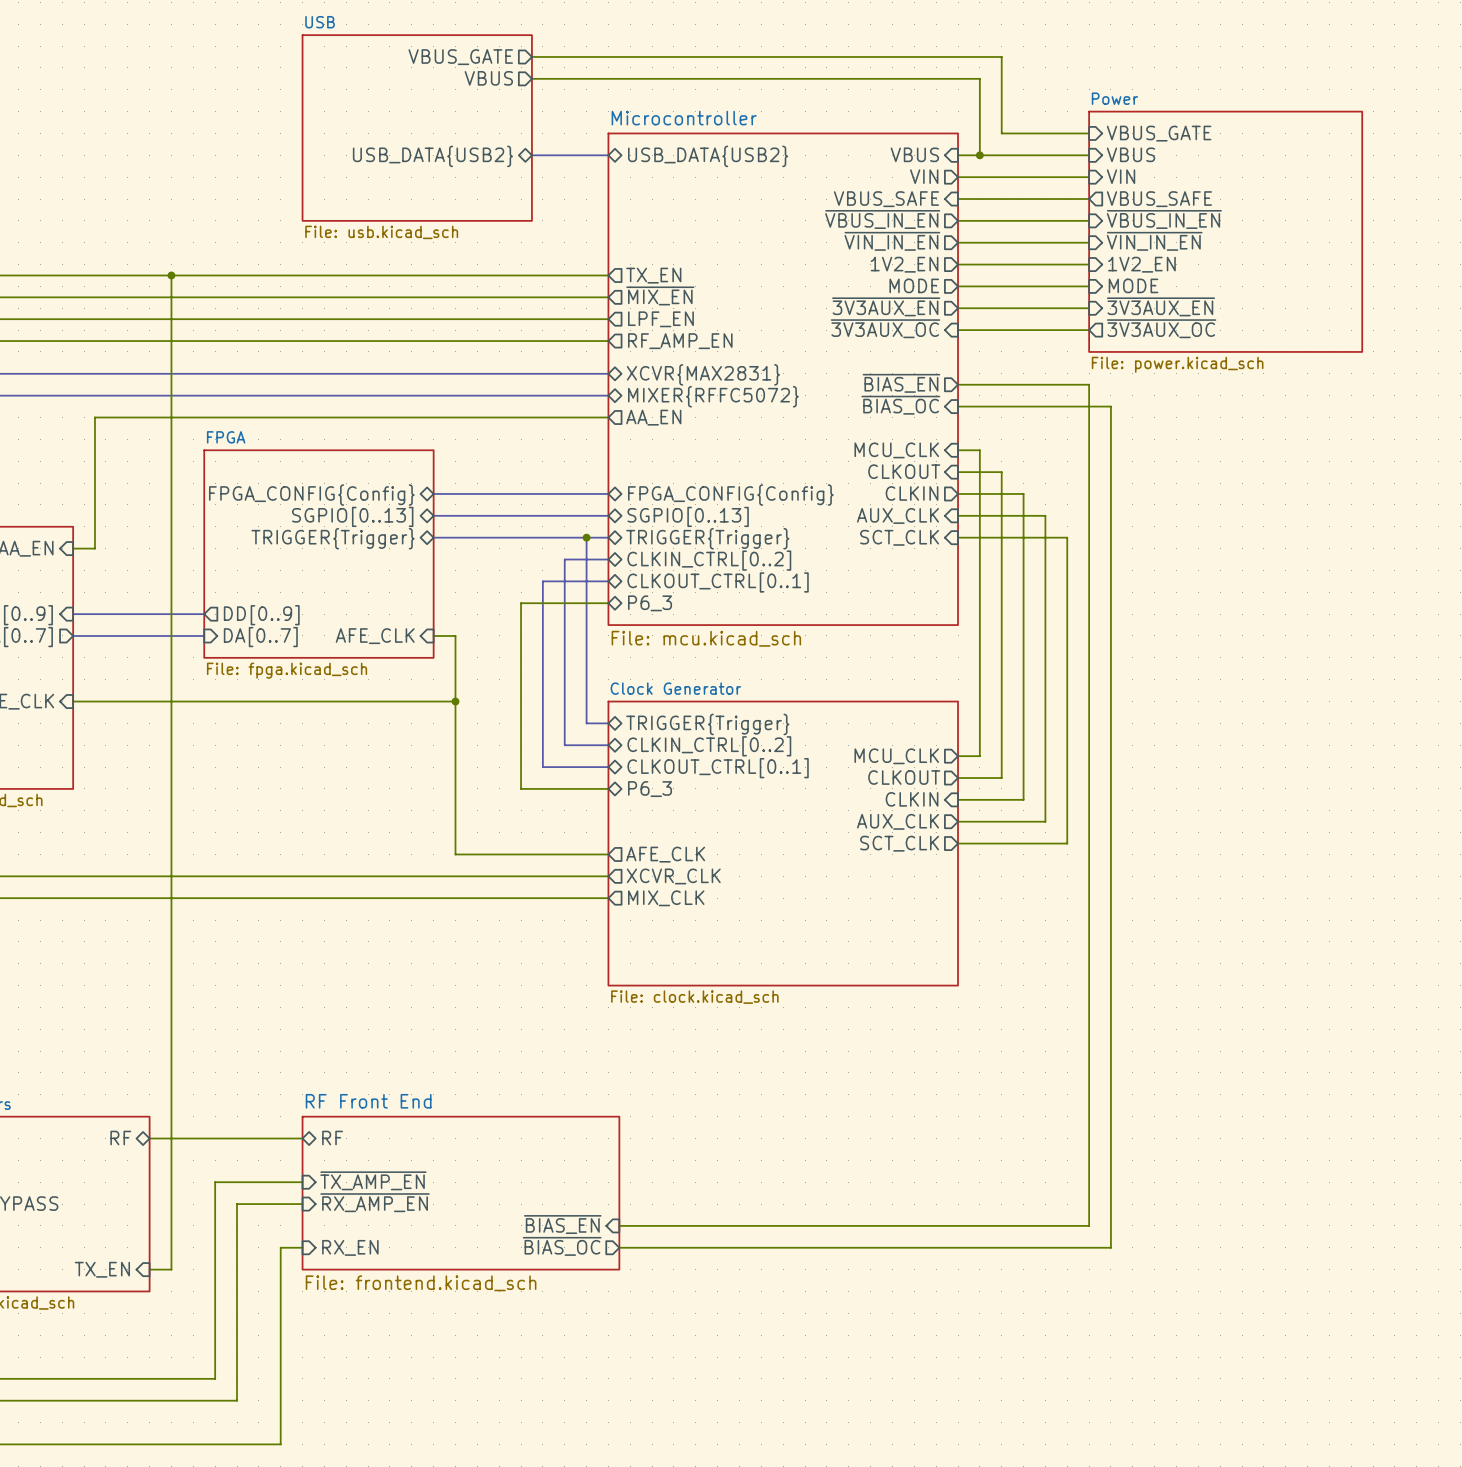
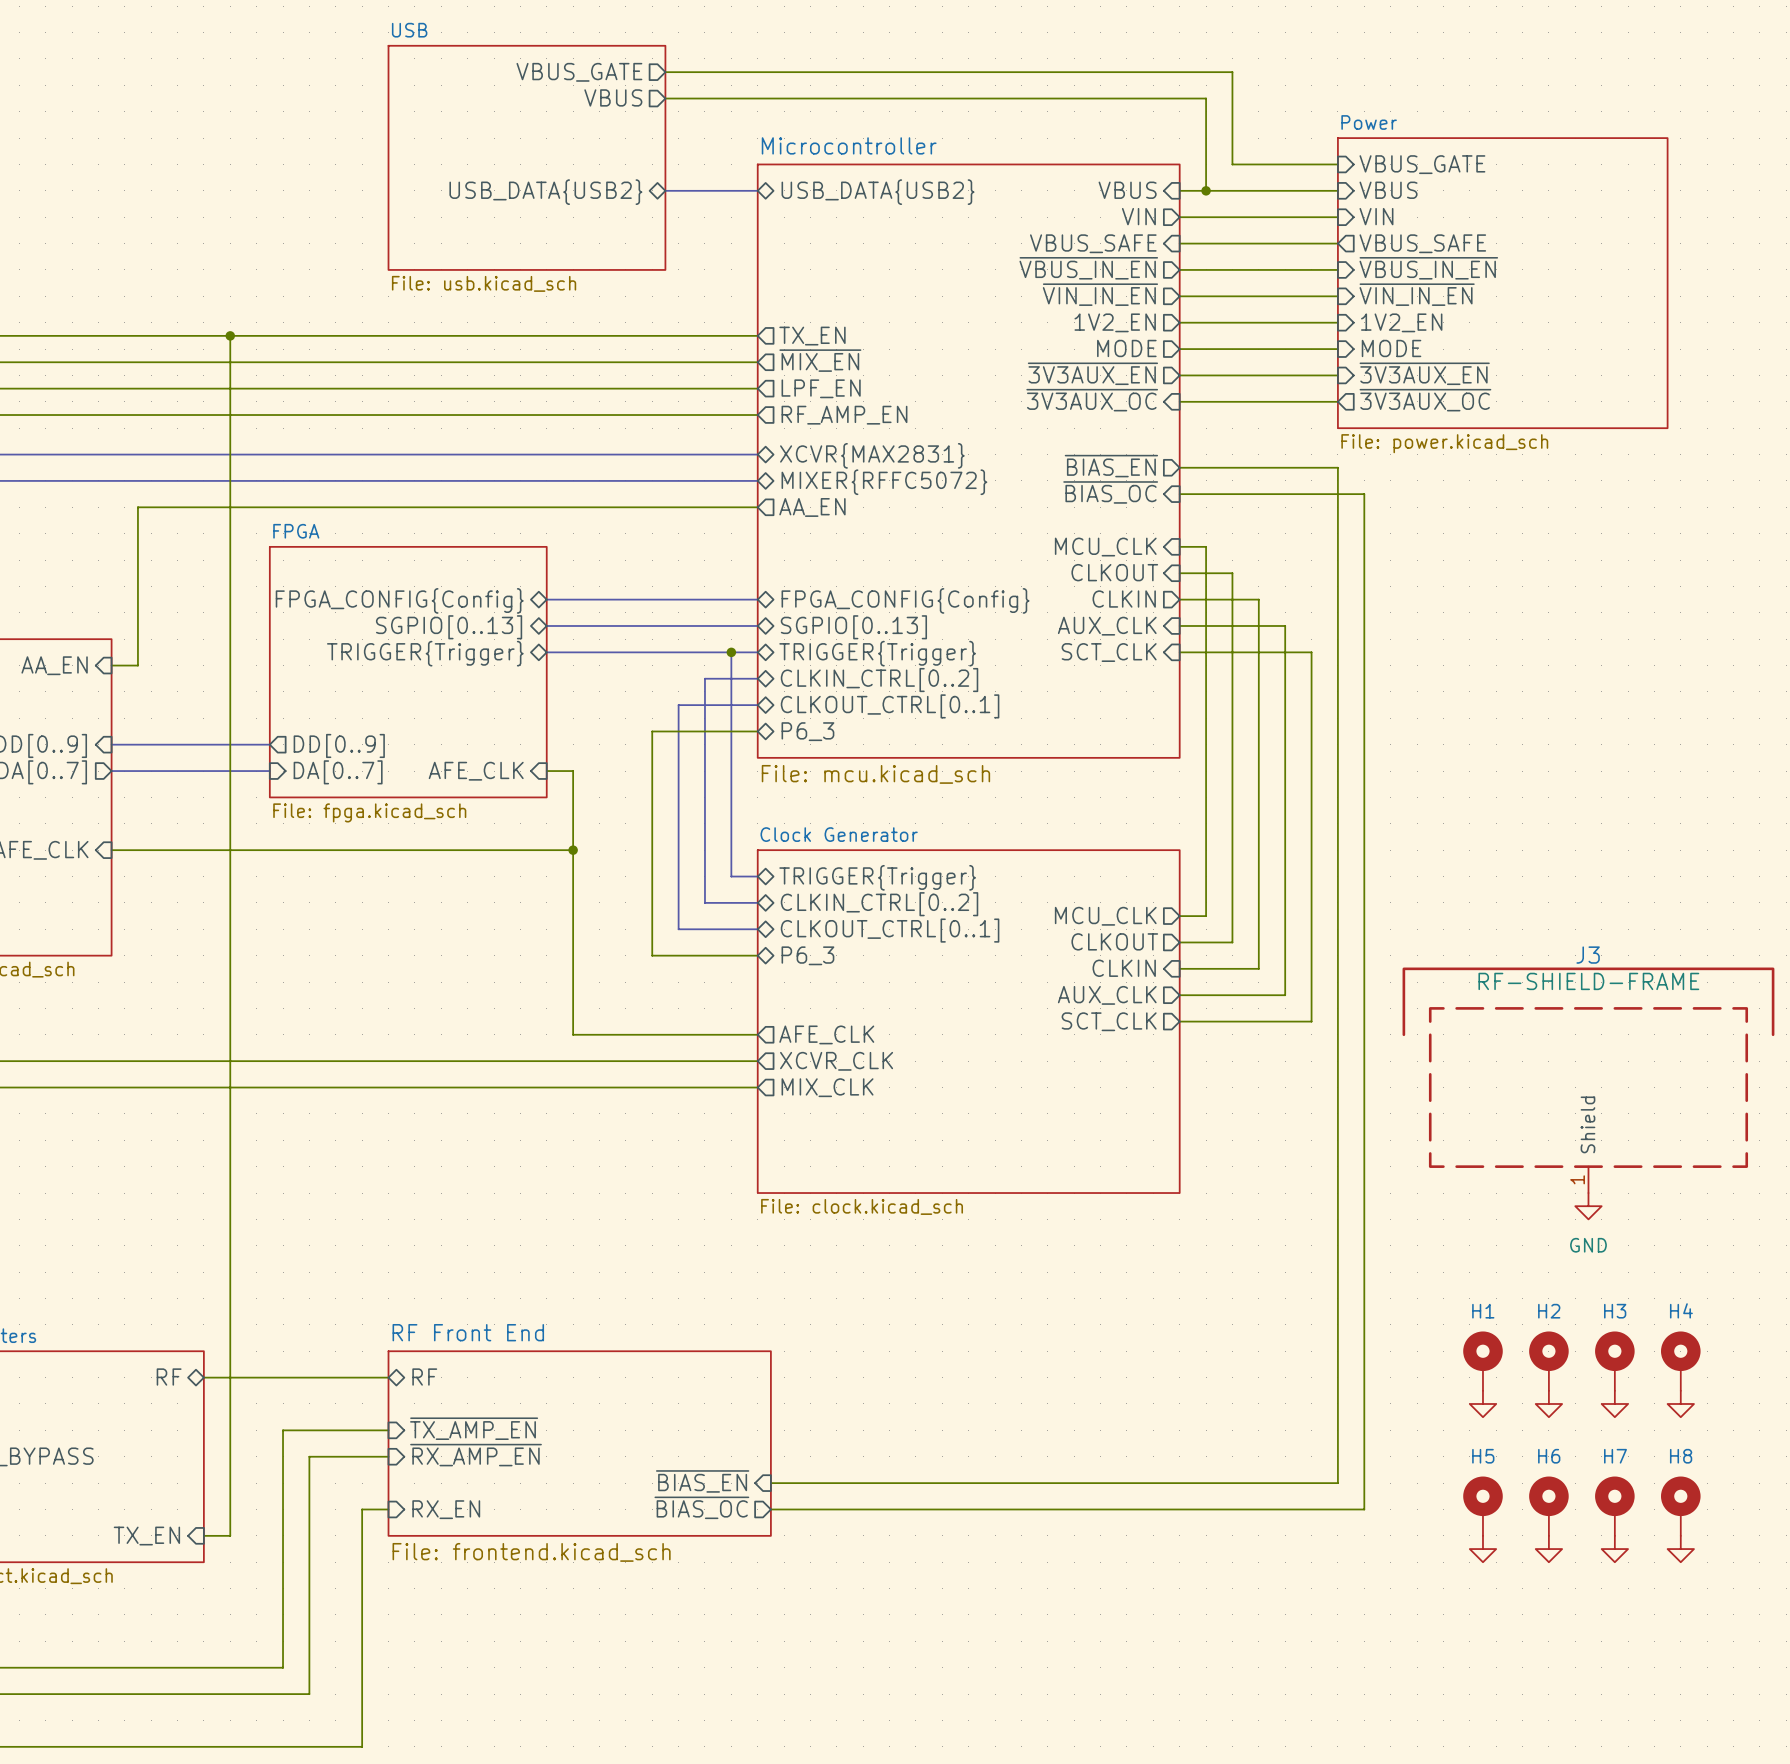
J3: none -> RF-SHIELD-FRAME (1588, 1080)
power symbol: none -> GND (1588, 1206)
H1: none -> (1482, 1361)
H2: none -> (1548, 1361)
H3: none -> (1614, 1361)
H4: none -> (1680, 1361)
power symbol: none -> (1482, 1403)
power symbol: none -> (1548, 1403)
power symbol: none -> (1614, 1403)
power symbol: none -> (1680, 1403)
H5: none -> (1482, 1506)
H6: none -> (1548, 1506)
H7: none -> (1614, 1506)
H8: none -> (1680, 1506)
power symbol: none -> (1482, 1549)
power symbol: none -> (1548, 1549)
power symbol: none -> (1614, 1549)
power symbol: none -> (1680, 1549)

